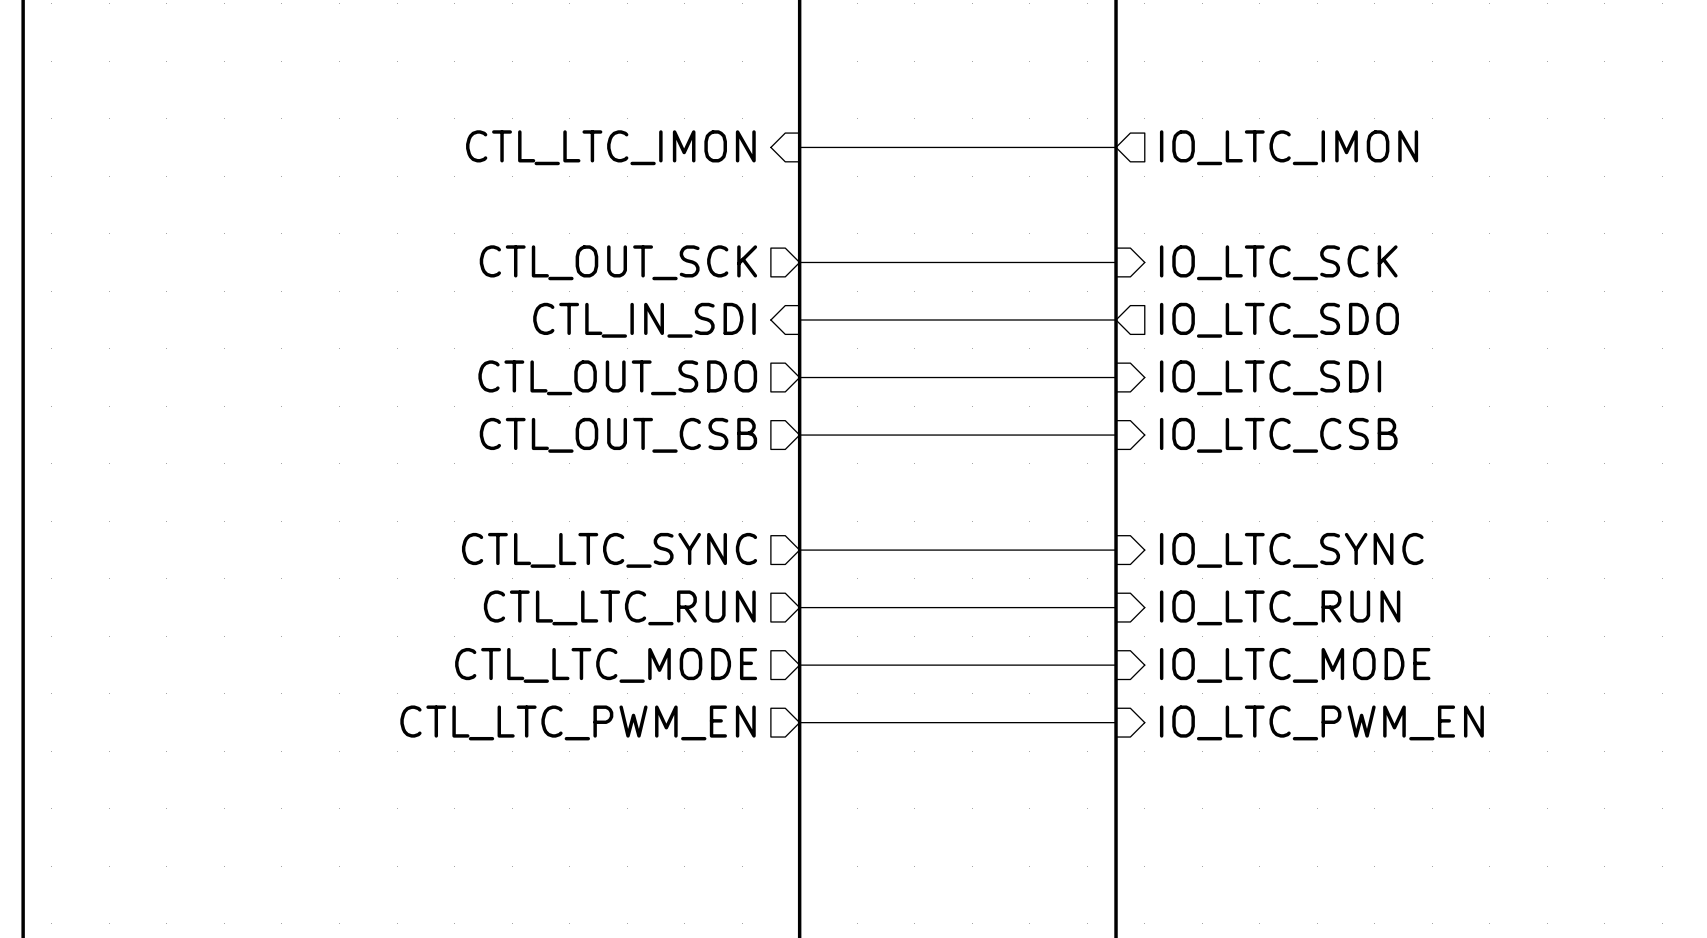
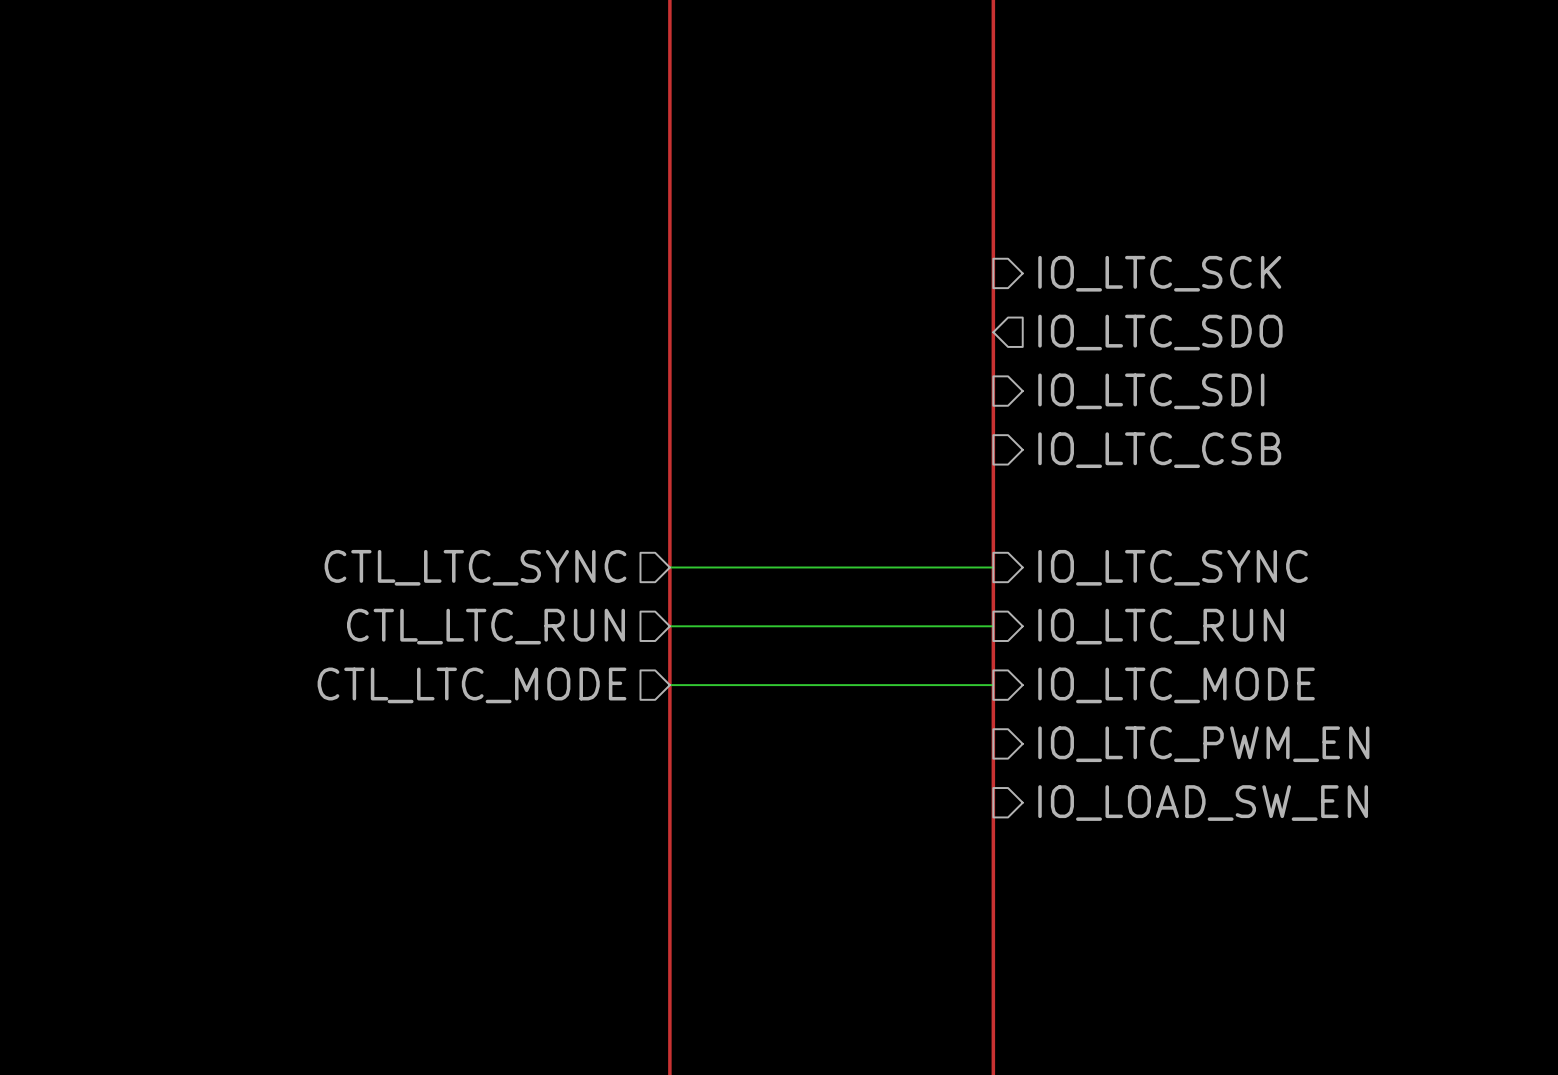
sheet pin: CTL_LTC_IMON (610, 147) -> none
wire: (799, 147) (1116, 147) -> none
sheet pin: IO_LTC_IMON (1289, 147) -> none
sheet pin: CTL_OUT_SCK (618, 262) -> none
wire: (799, 262) (1116, 262) -> none
sheet pin: CTL_IN_SDI (644, 320) -> none
wire: (799, 320) (1116, 320) -> none
sheet pin: CTL_OUT_SDO (617, 377) -> none
wire: (799, 377) (1116, 377) -> none
sheet pin: CTL_OUT_CSB (618, 435) -> none
wire: (799, 435) (1116, 435) -> none
sheet pin: CTL_LTC_PWM_EN (578, 722) -> none
wire: (799, 722) (1116, 722) -> none
sheet pin: none -> IO_LOAD_SW_EN (1203, 803)

